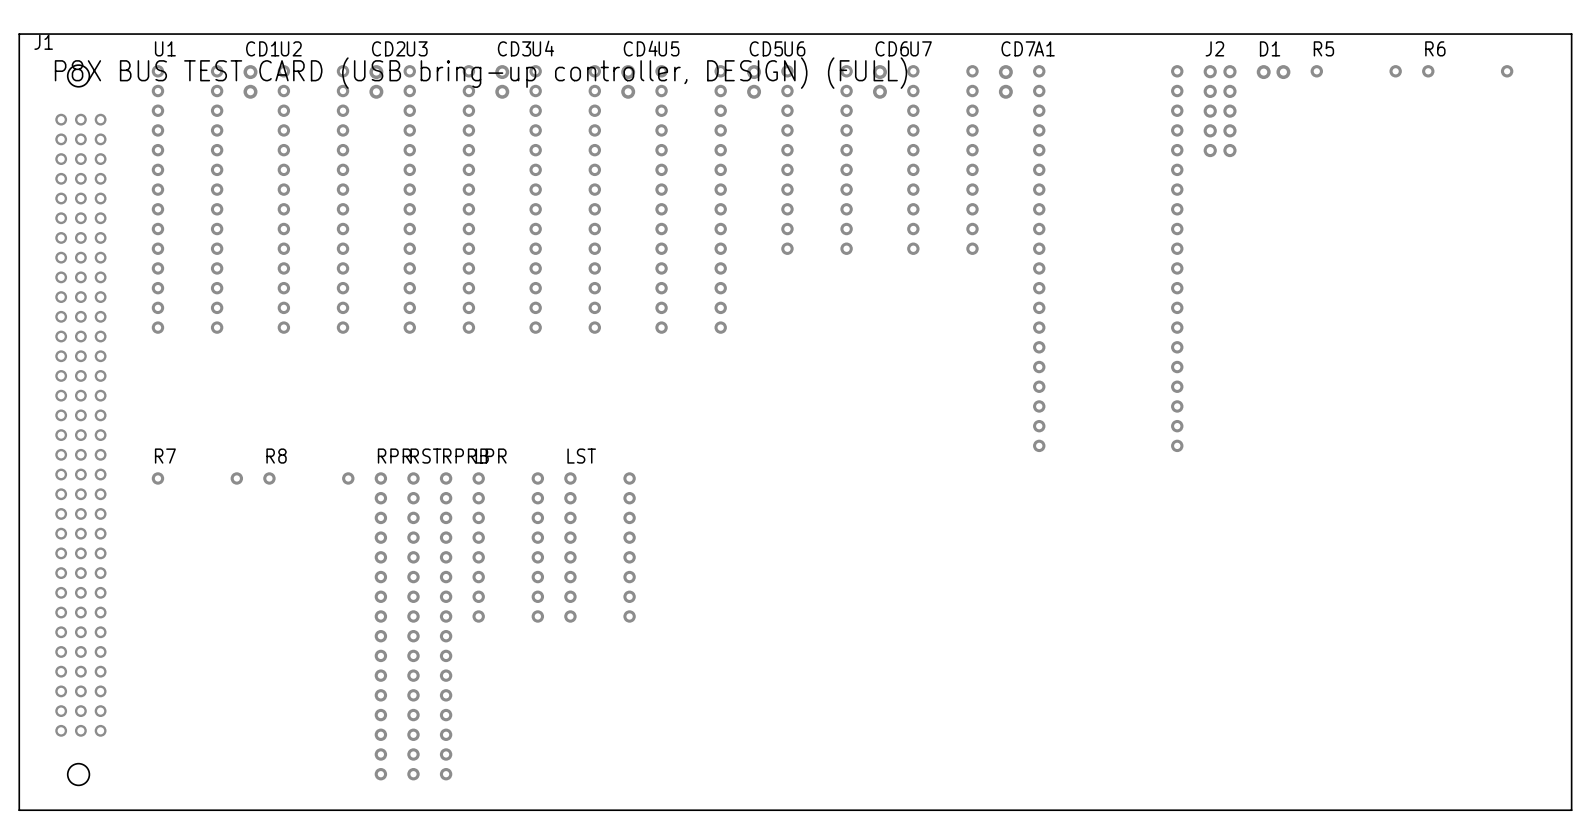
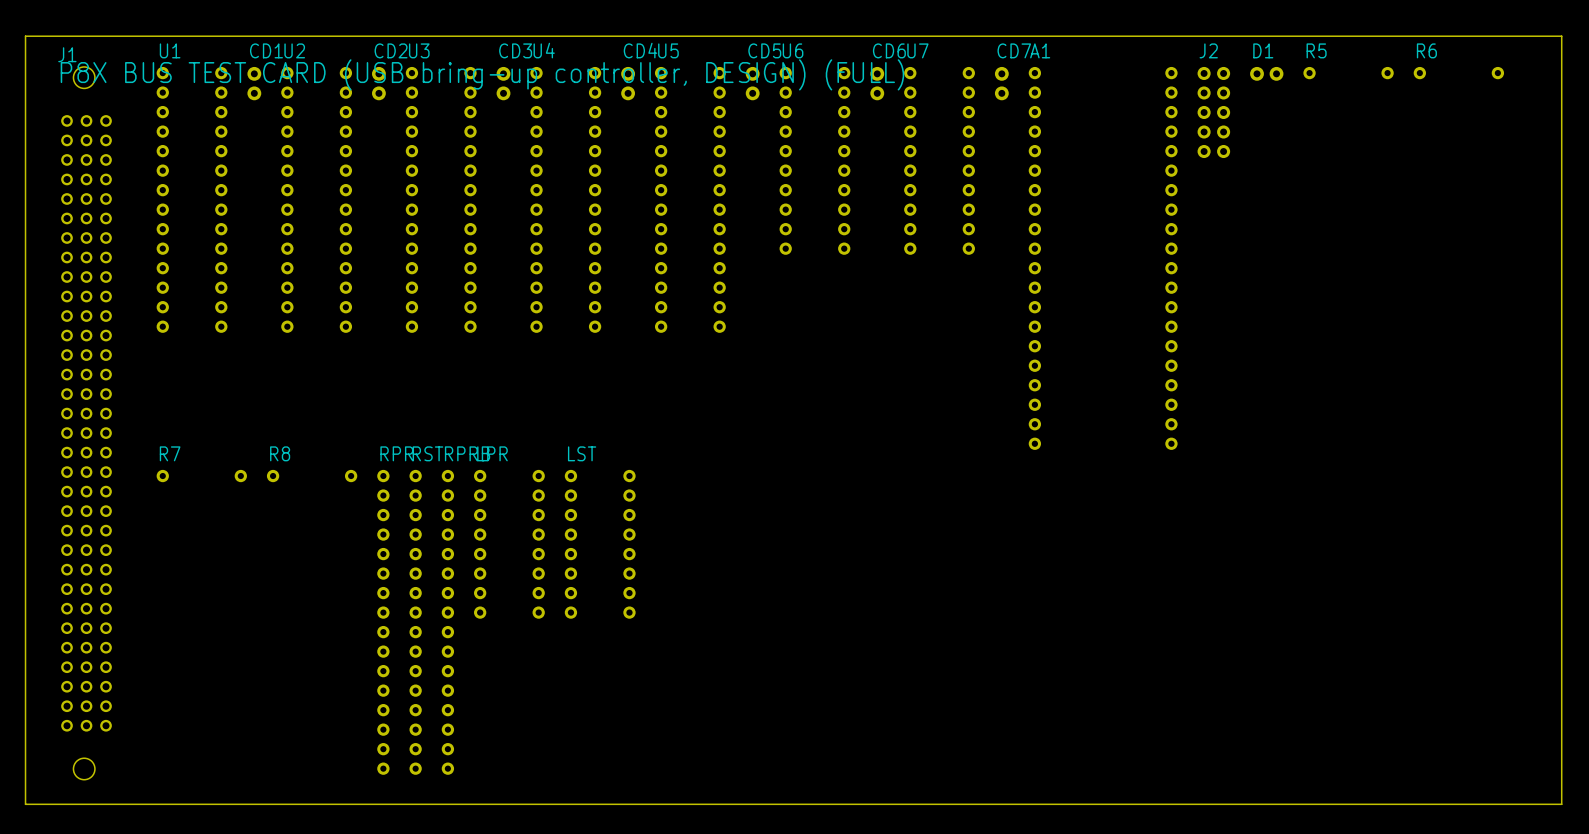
J1 name position: J1 (43, 42) -> J1 (67, 54)

